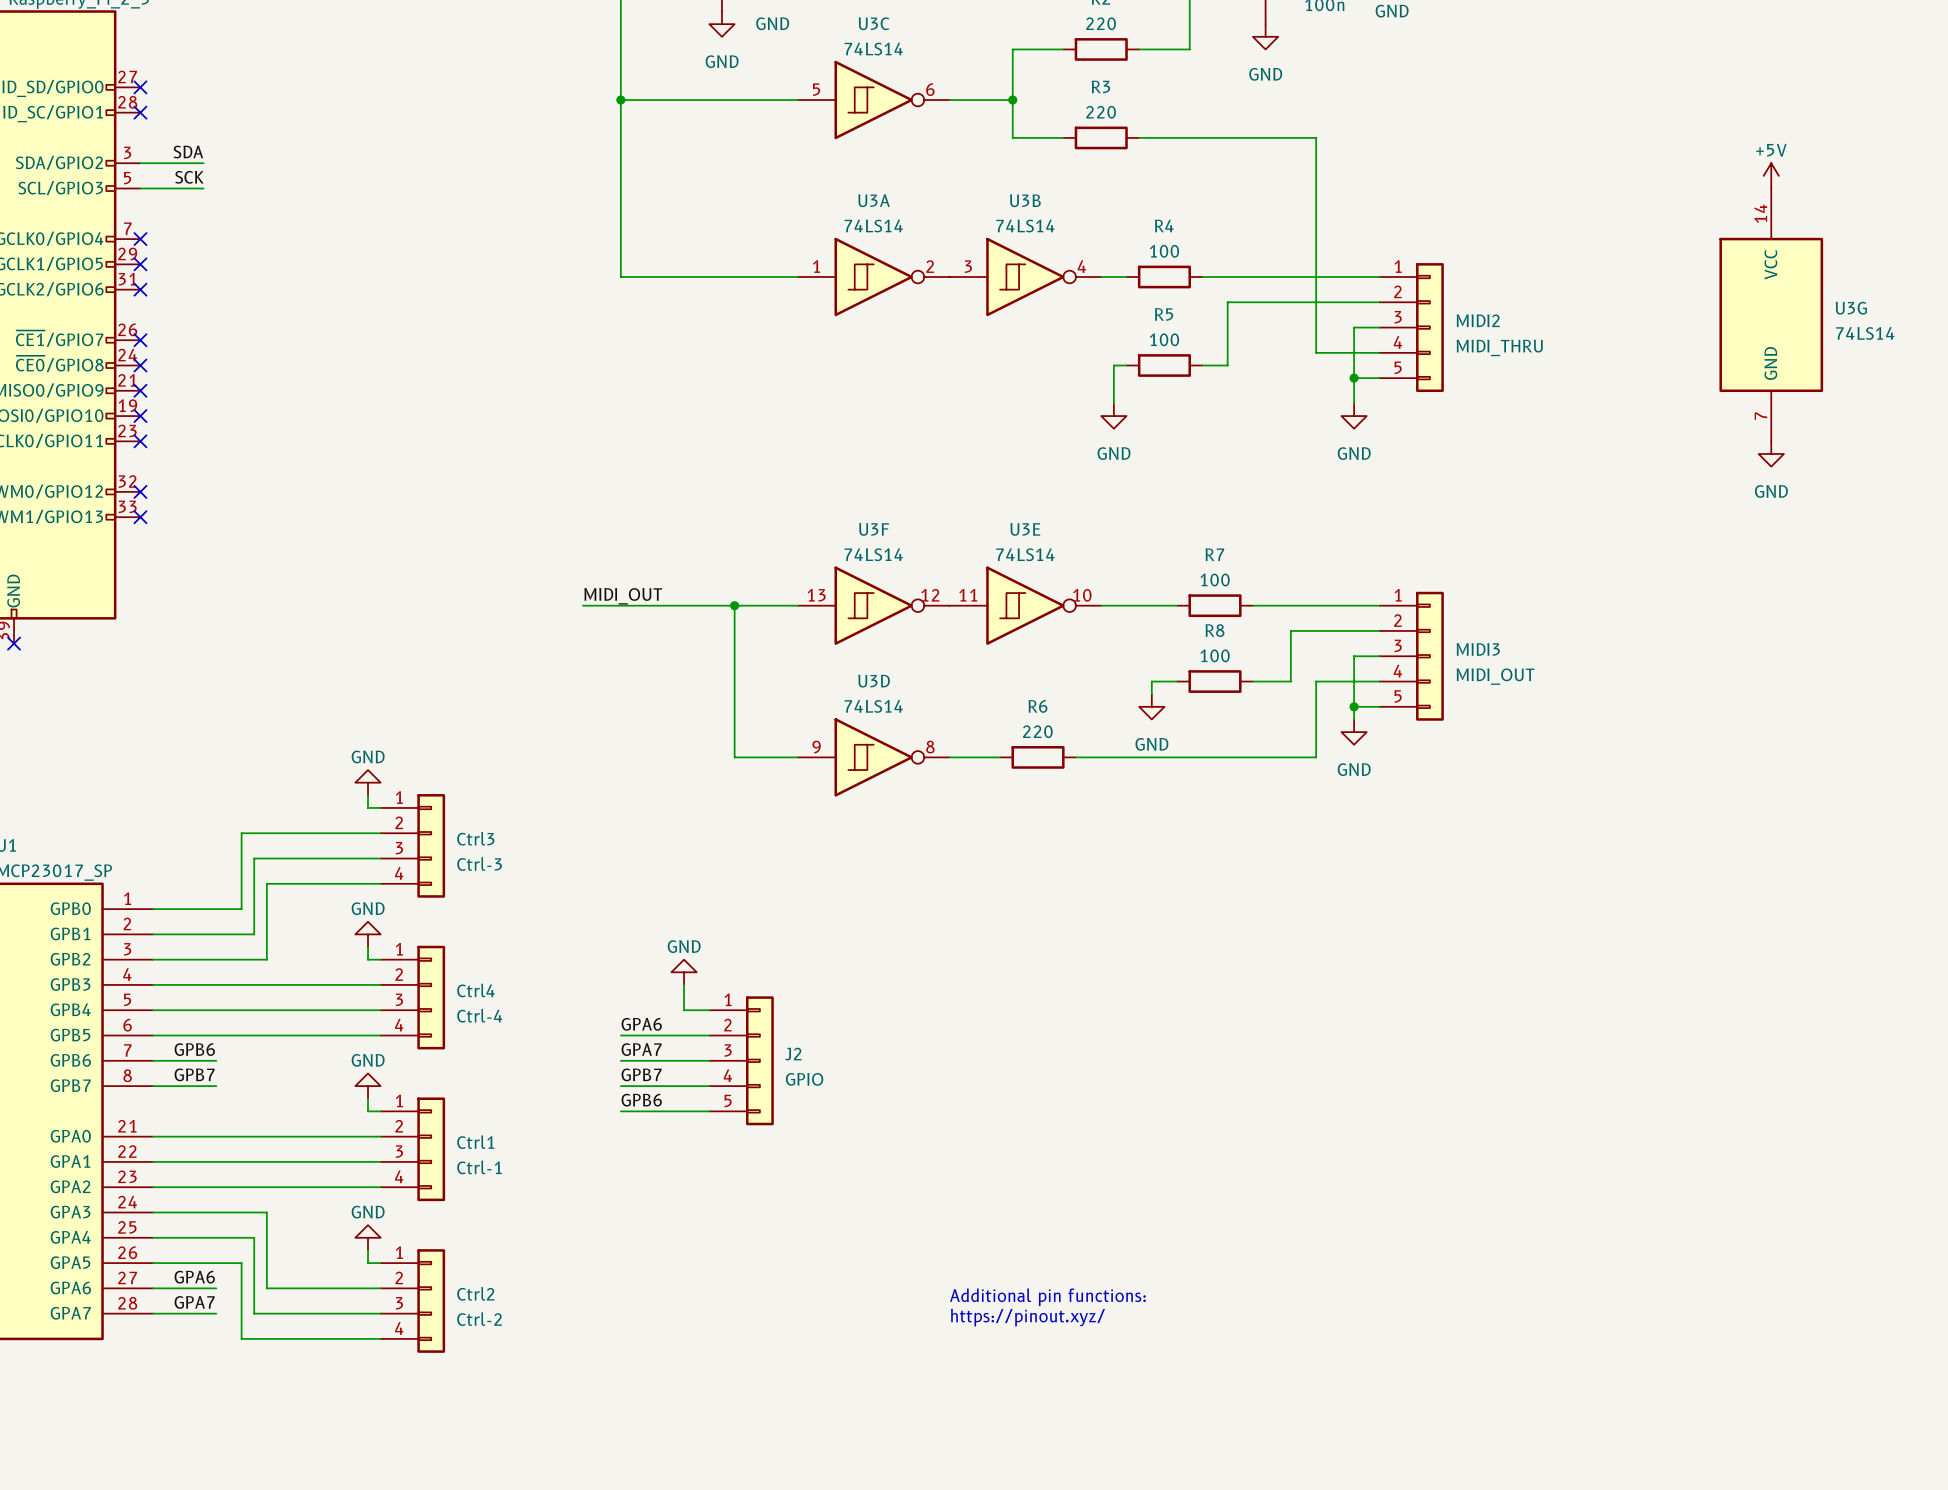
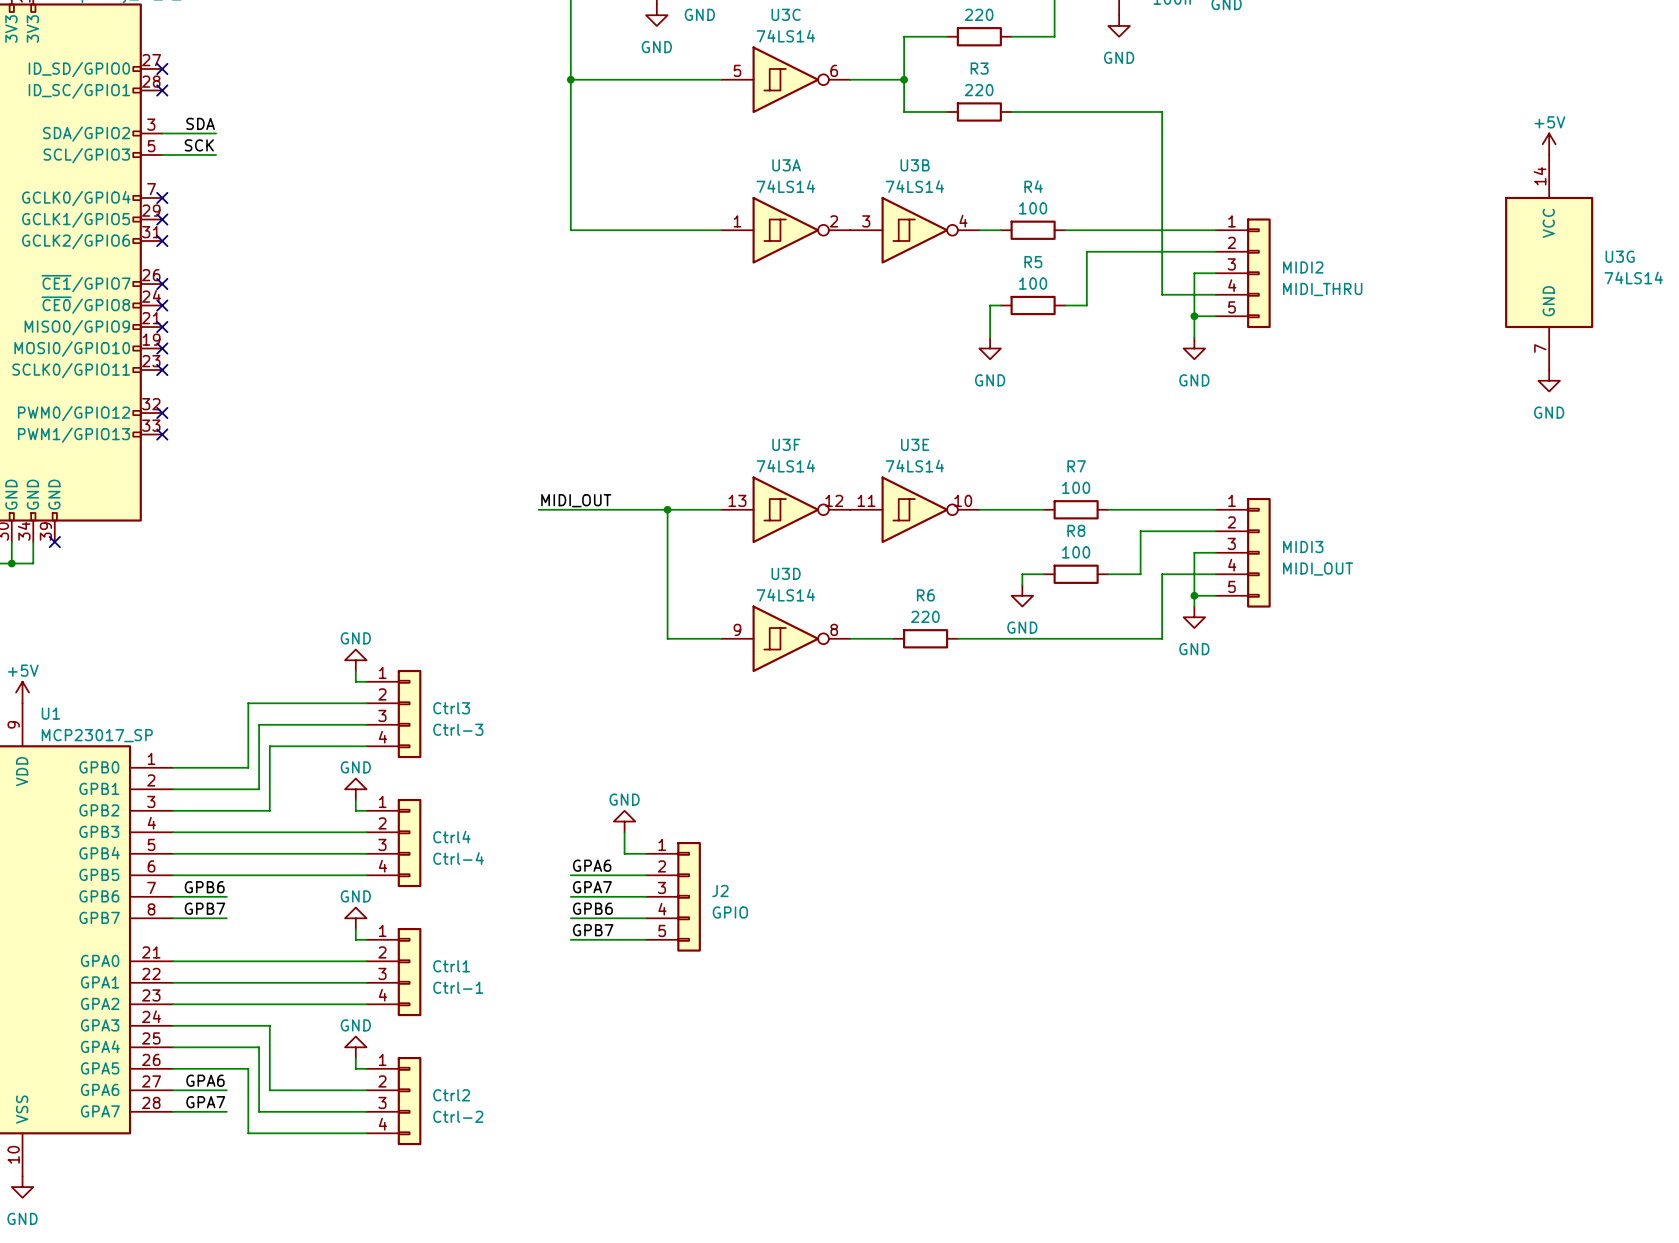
label: GPB7 (641, 1074) -> GPB6 (592, 908)
label: GPB6 (641, 1100) -> GPB7 (593, 930)
text: Additional pin functions: (1047, 1297) -> none
text: https://pinout.xyz/ (1027, 1317) -> none

